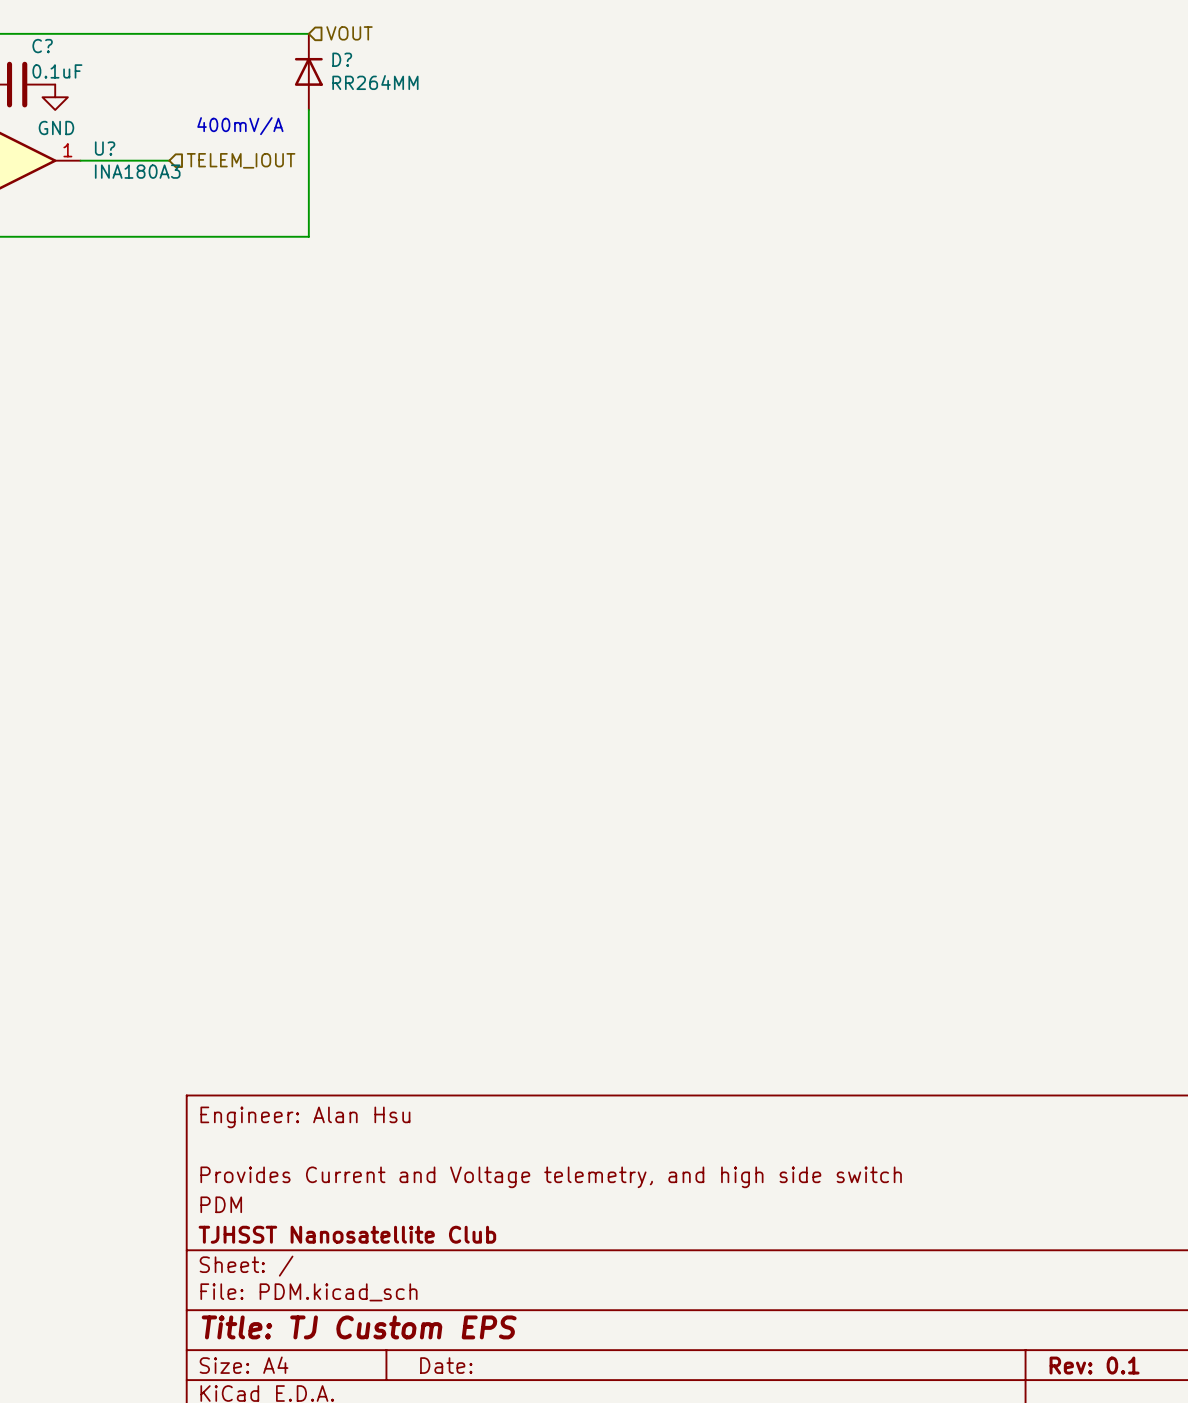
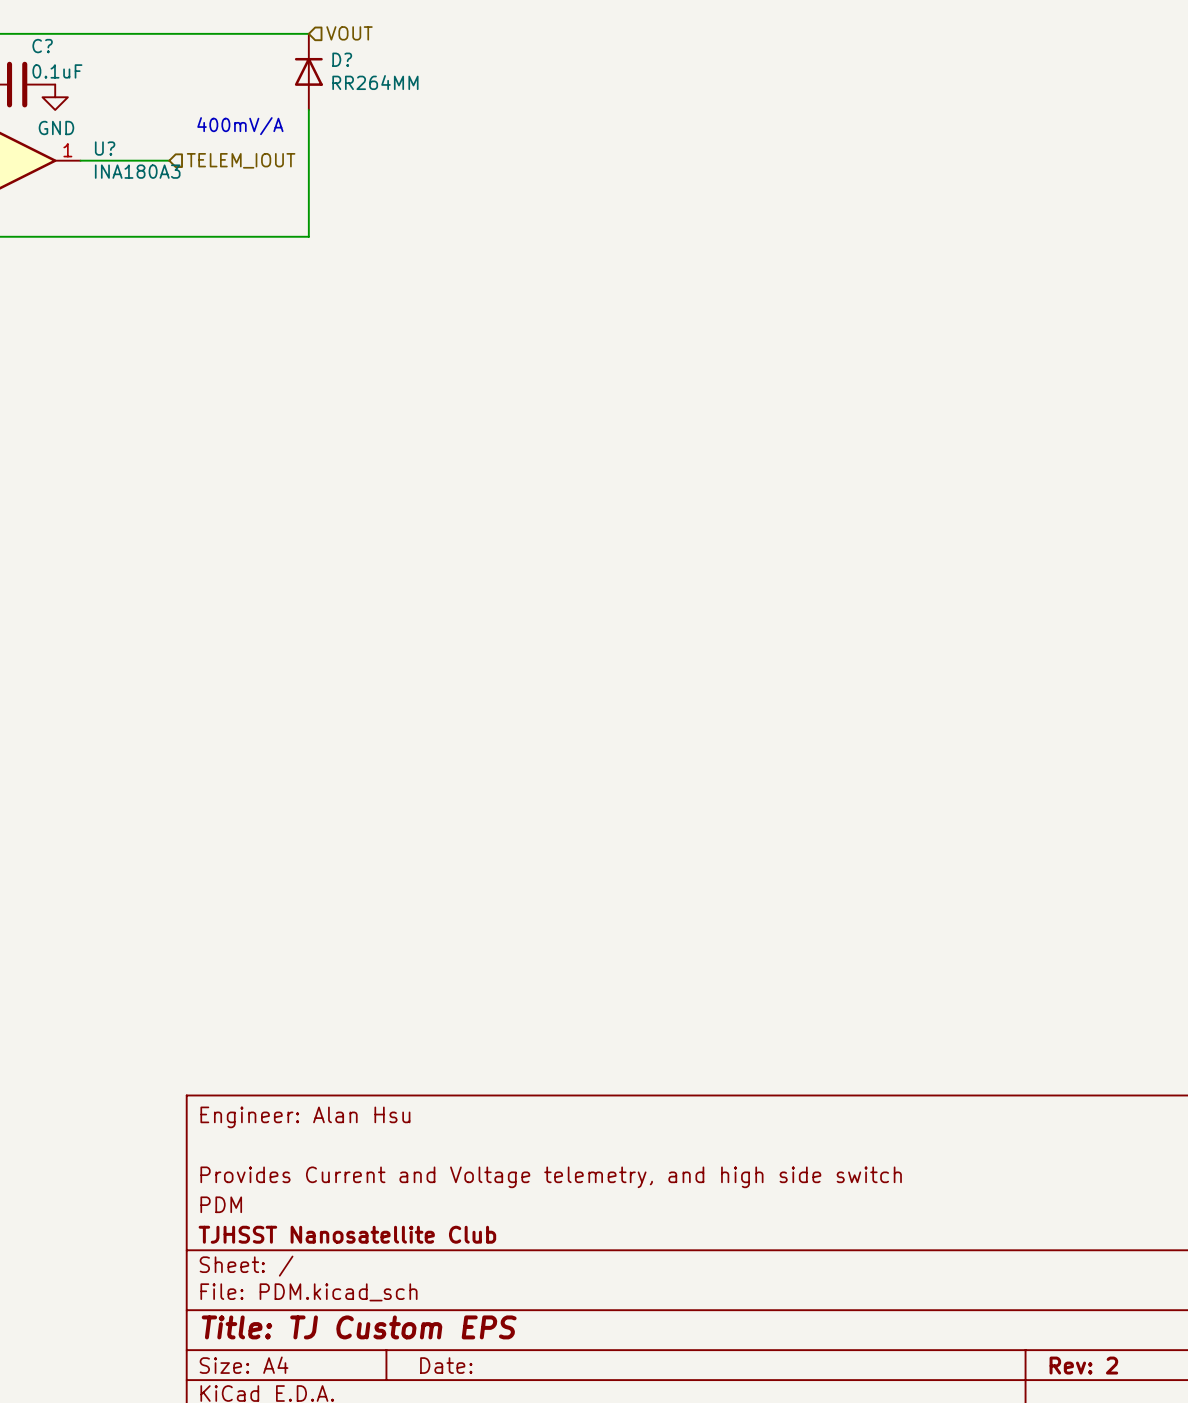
title block: Rev: 0.1 (1094, 1365) -> Rev: 2 (1083, 1365)

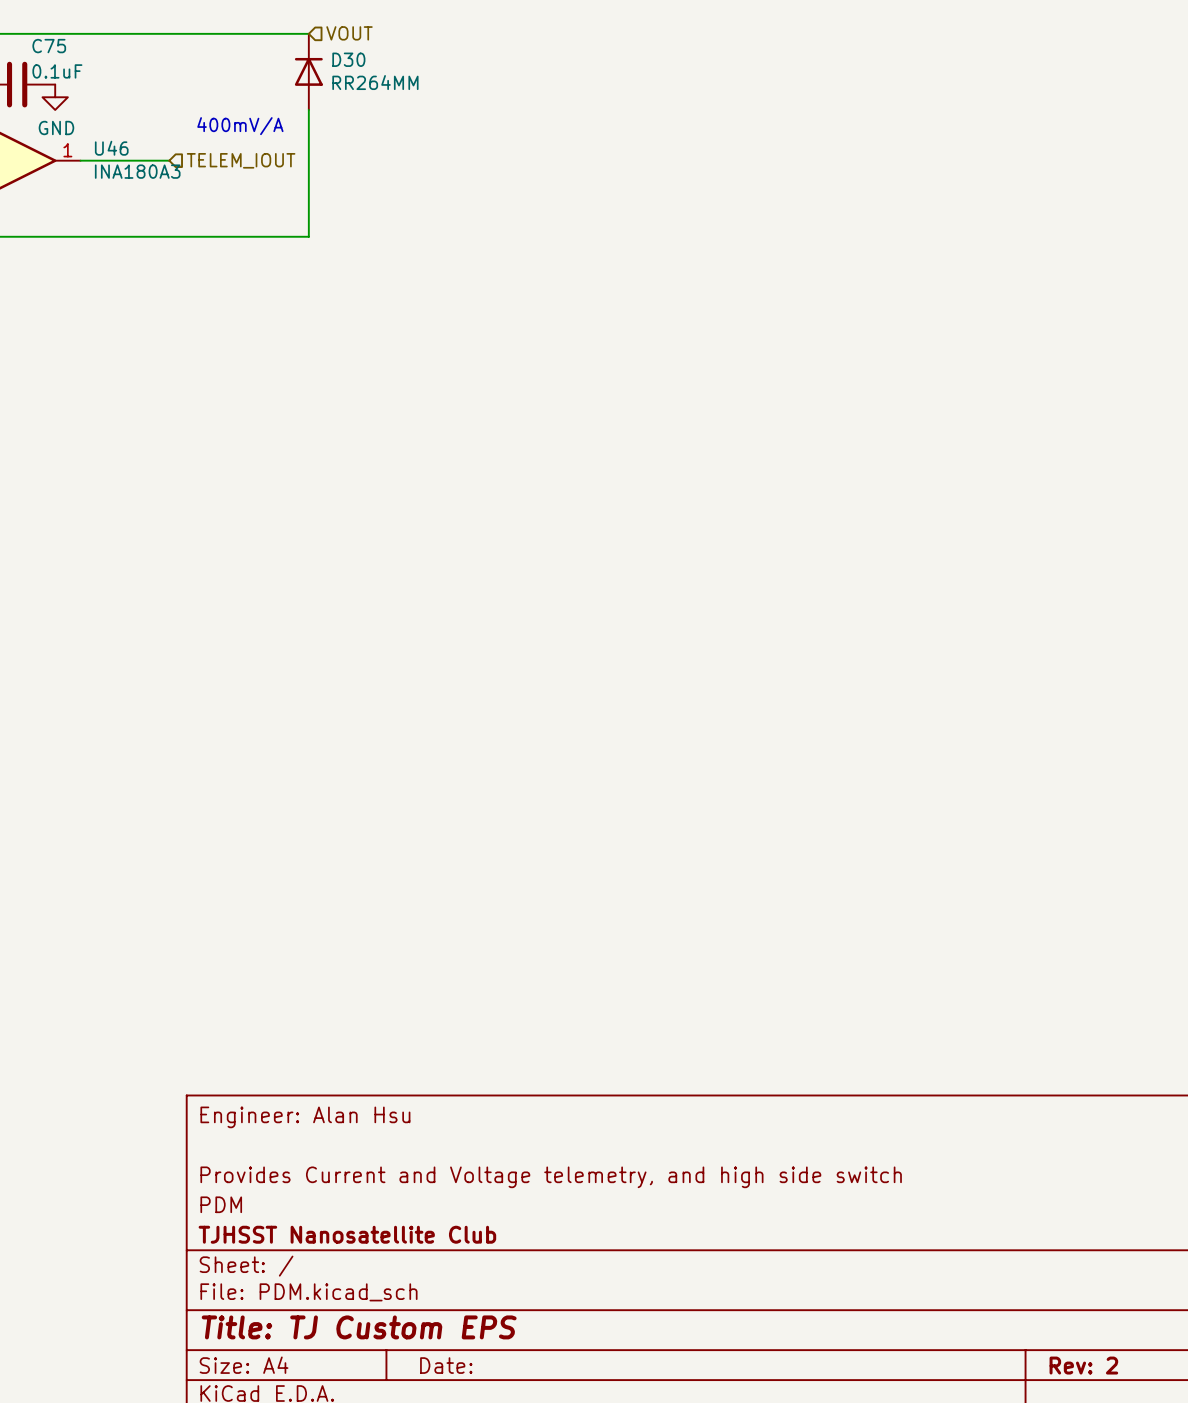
C? name: C? (42, 46) -> C75 (49, 46)
D? name: D? (342, 59) -> D30 (348, 59)
U? name: U? (105, 148) -> U46 (111, 148)

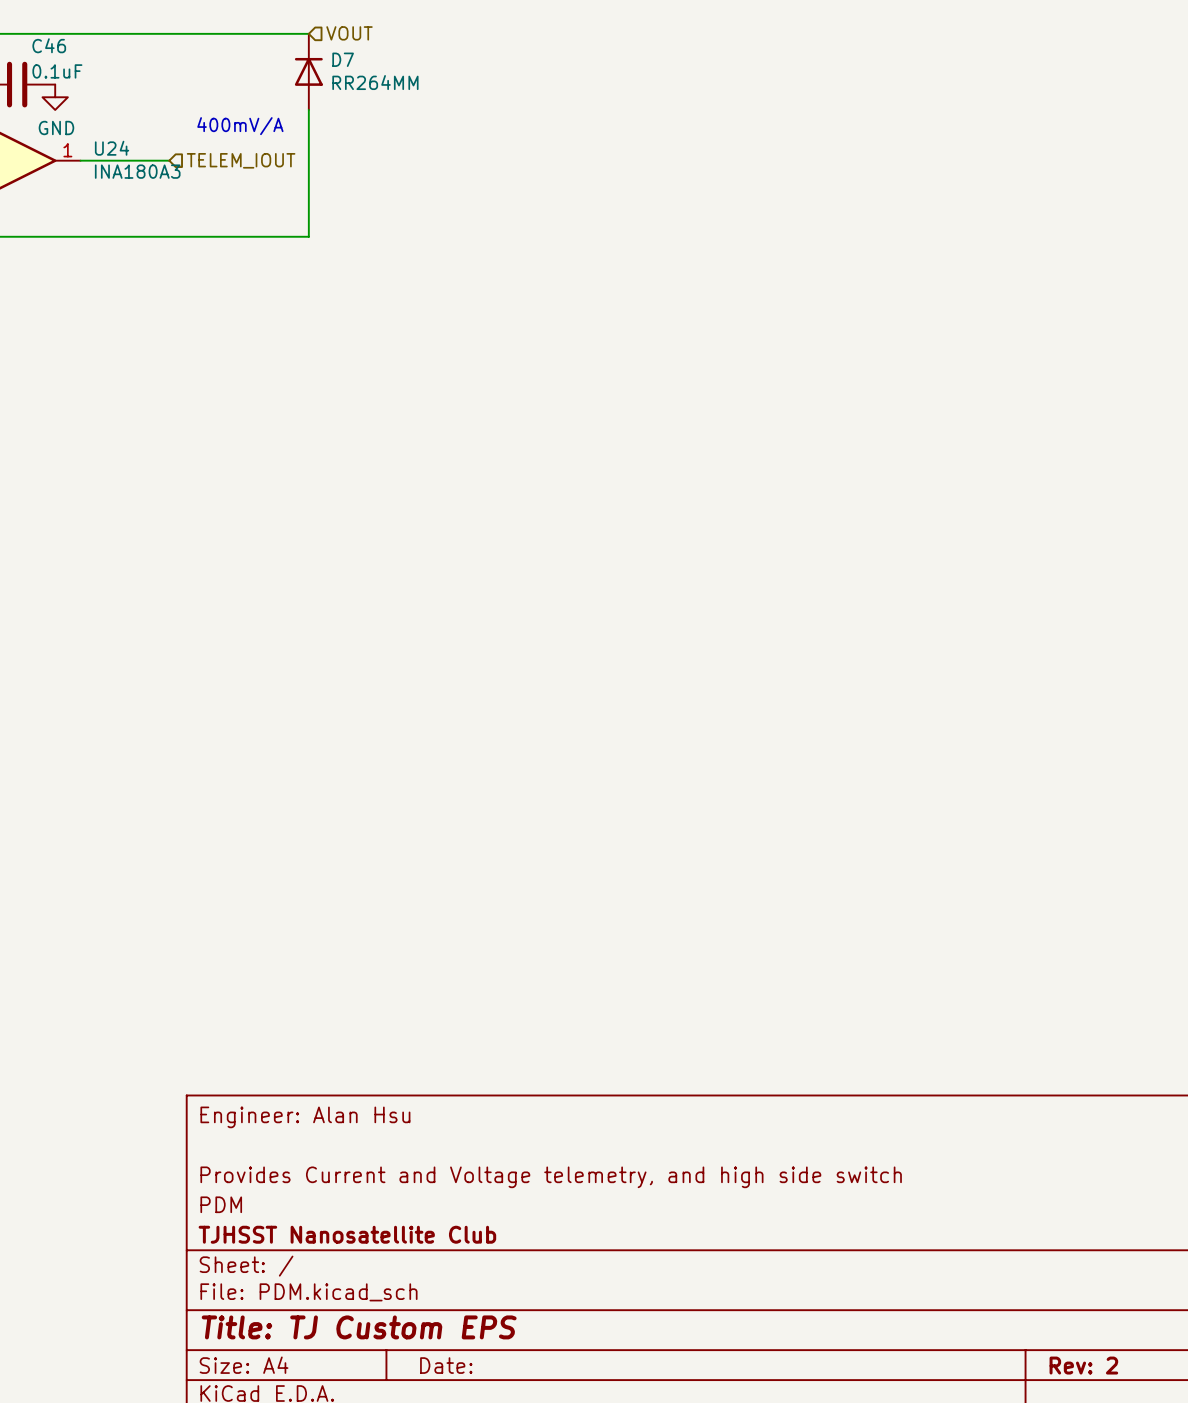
C75 name: C75 (49, 46) -> C46 (49, 45)
D30 name: D30 (348, 59) -> D7 (343, 59)
U46 name: U46 (111, 148) -> U24 (112, 148)

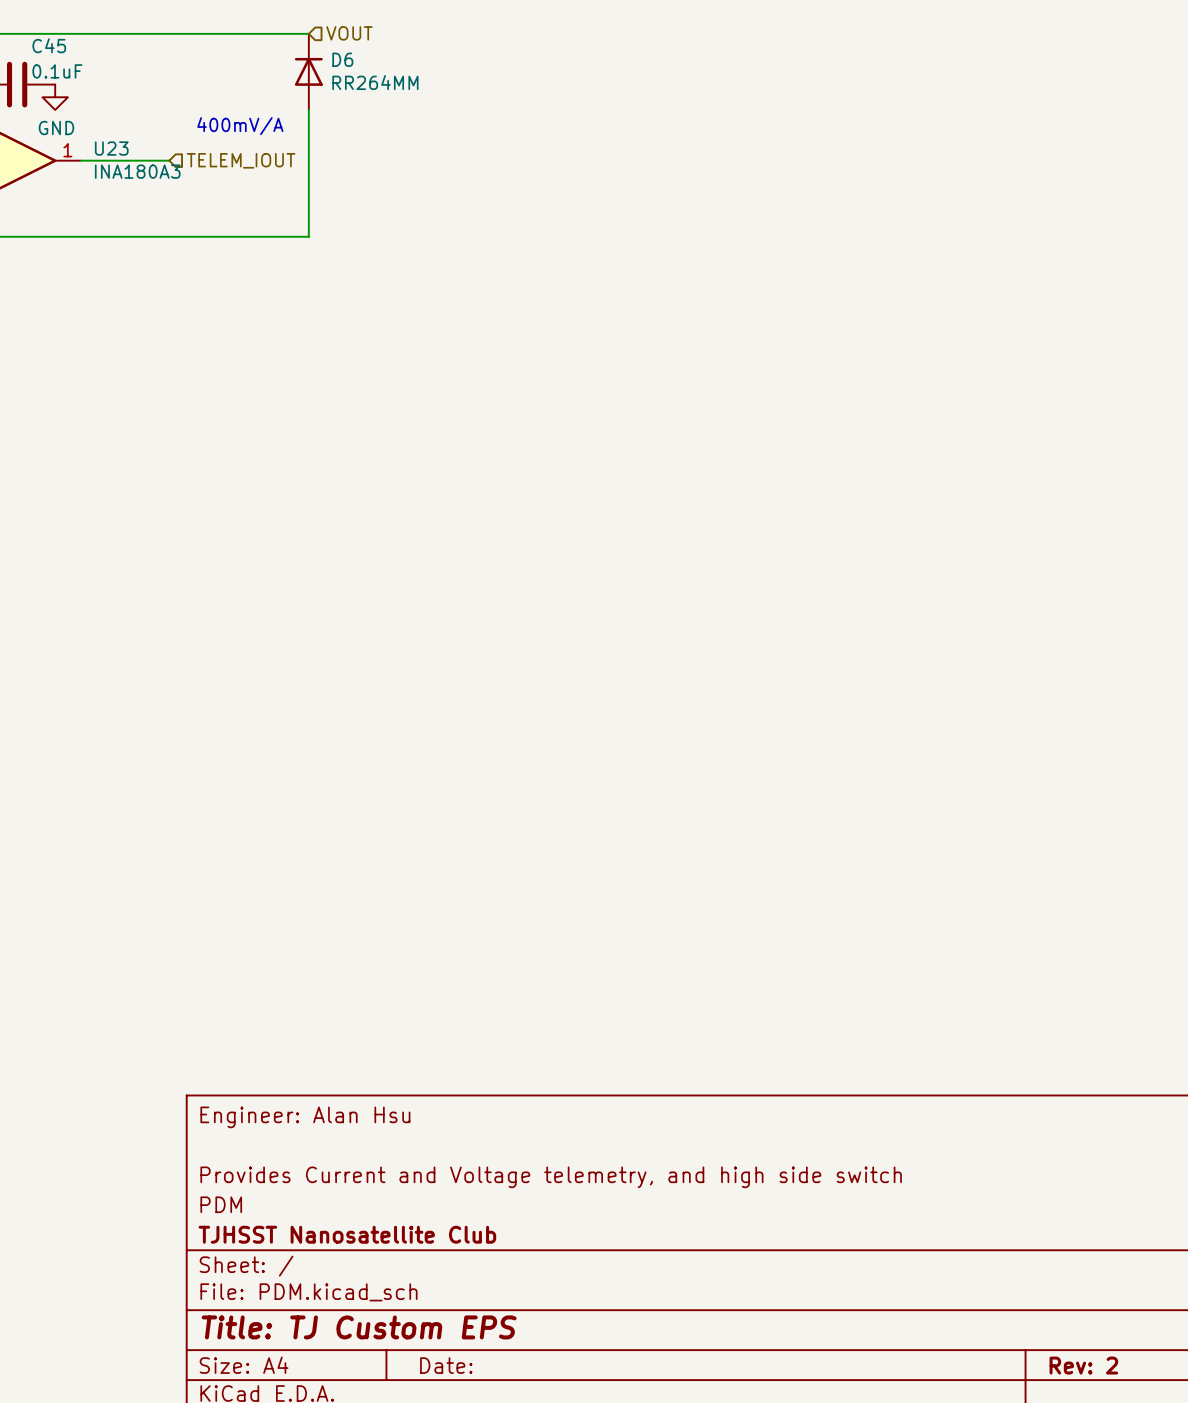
C46 name: C46 (49, 45) -> C45 (49, 45)
D7 name: D7 (343, 59) -> D6 (342, 59)
U24 name: U24 (112, 148) -> U23 (111, 148)

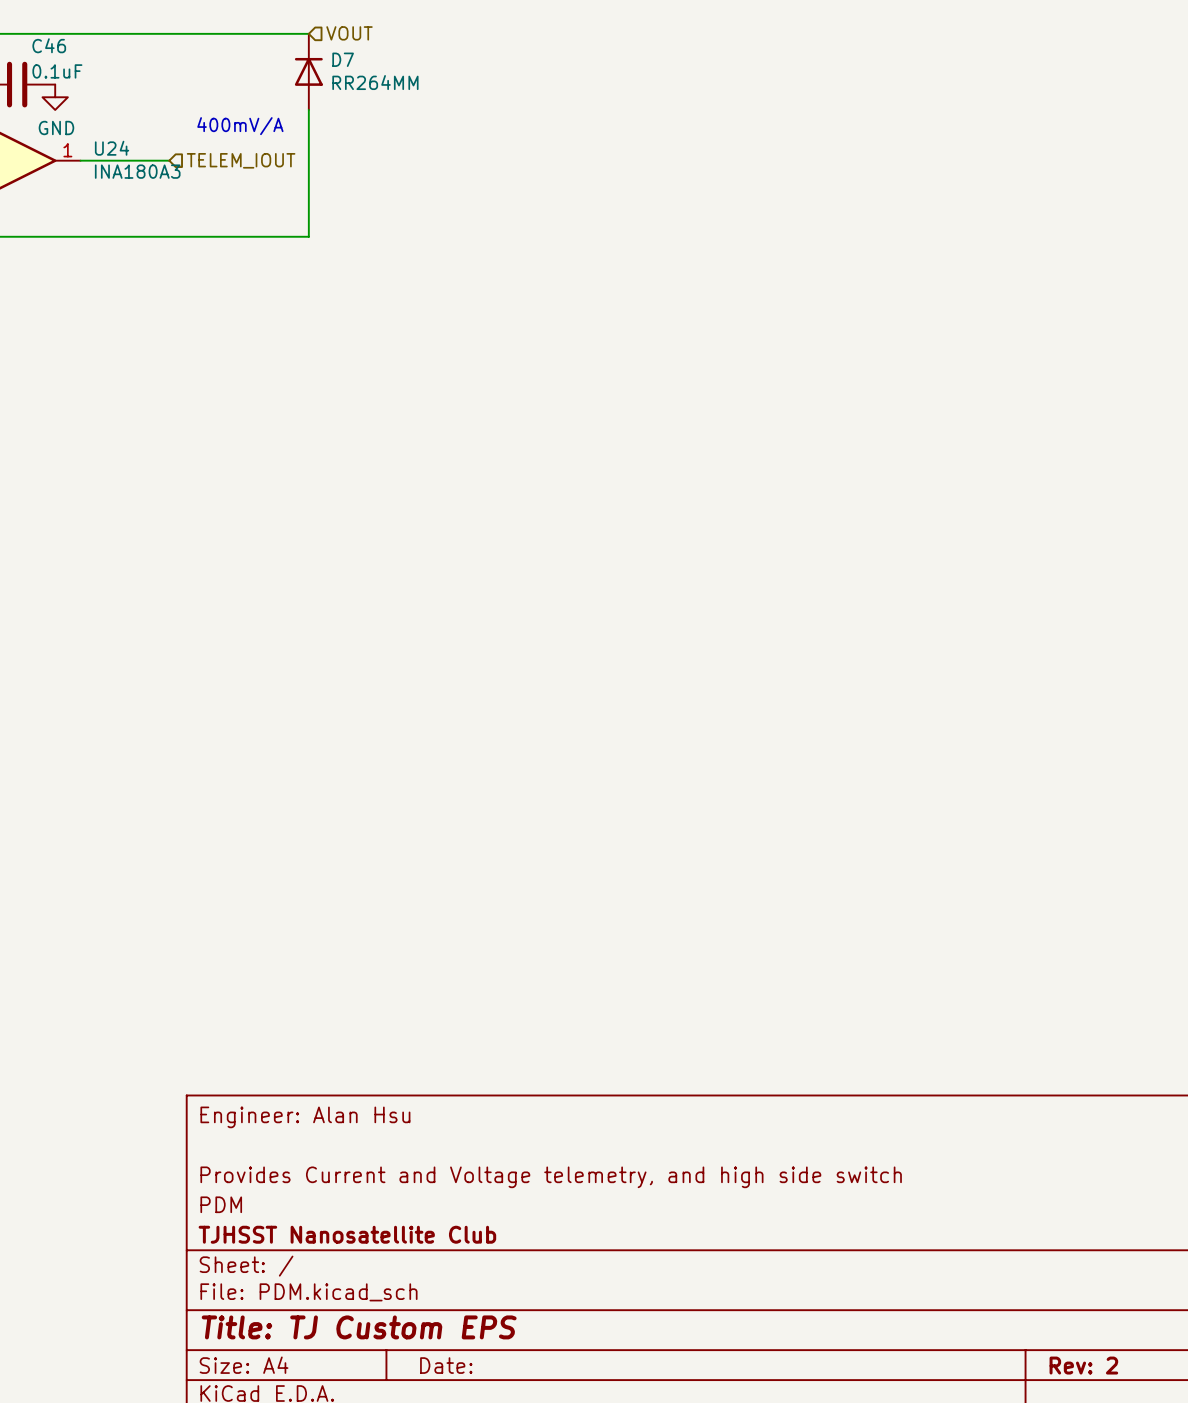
C45 name: C45 (49, 45) -> C46 (49, 45)
D6 name: D6 (342, 59) -> D7 (343, 59)
U23 name: U23 (111, 148) -> U24 (112, 148)

